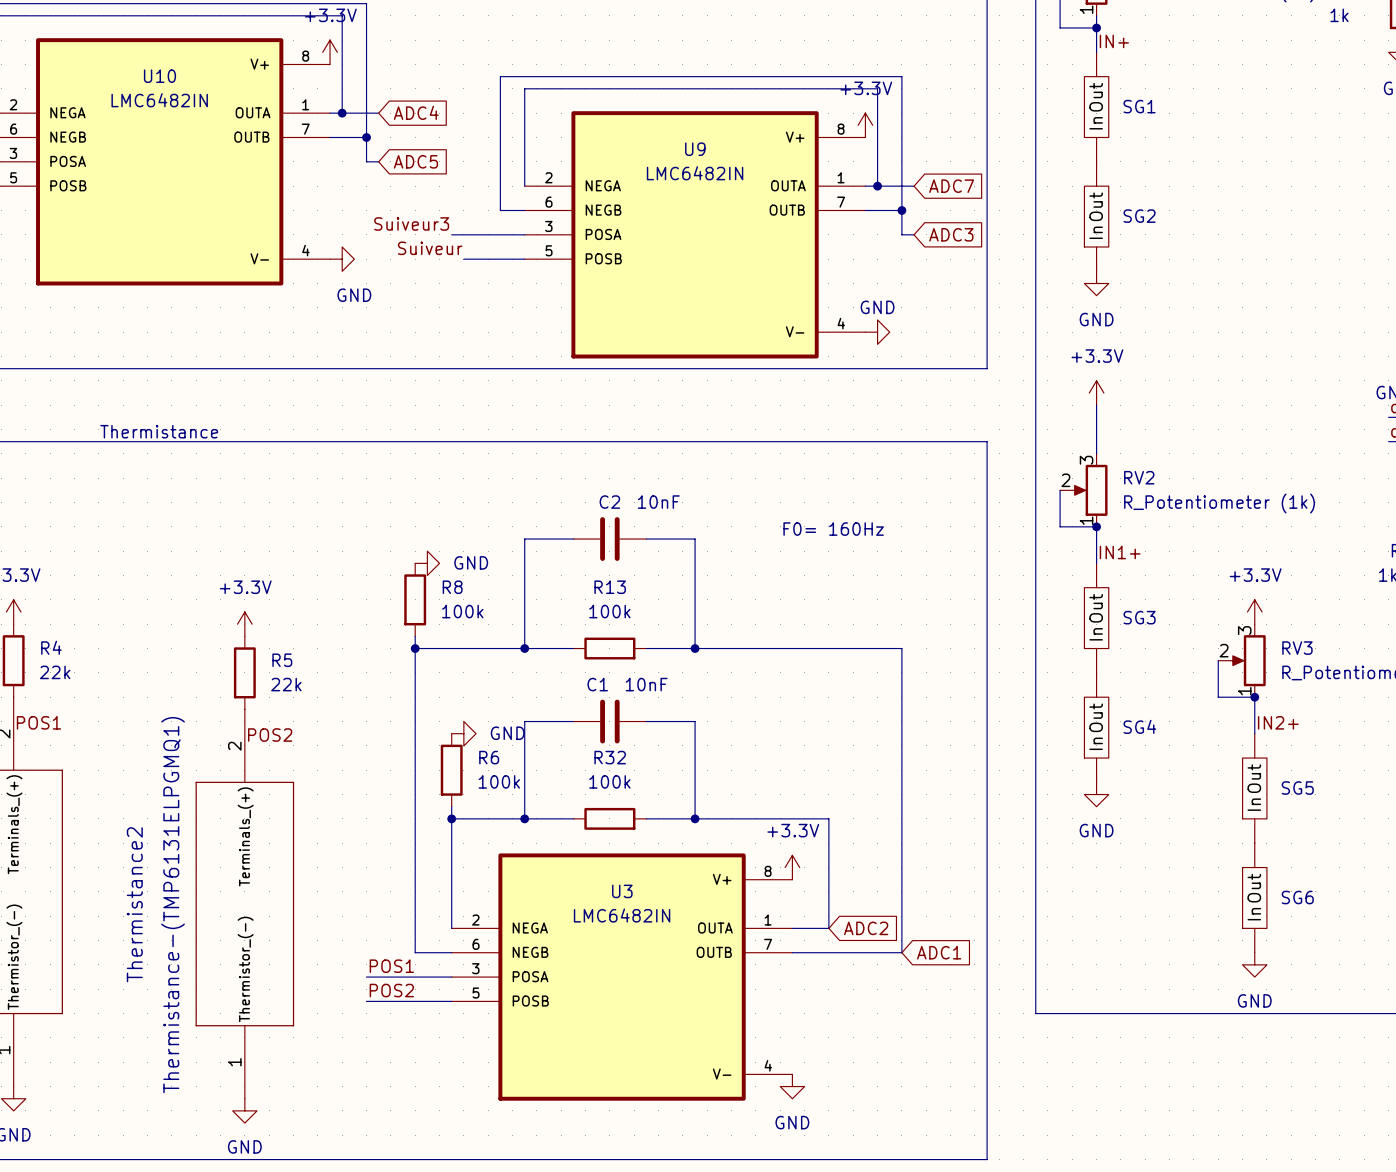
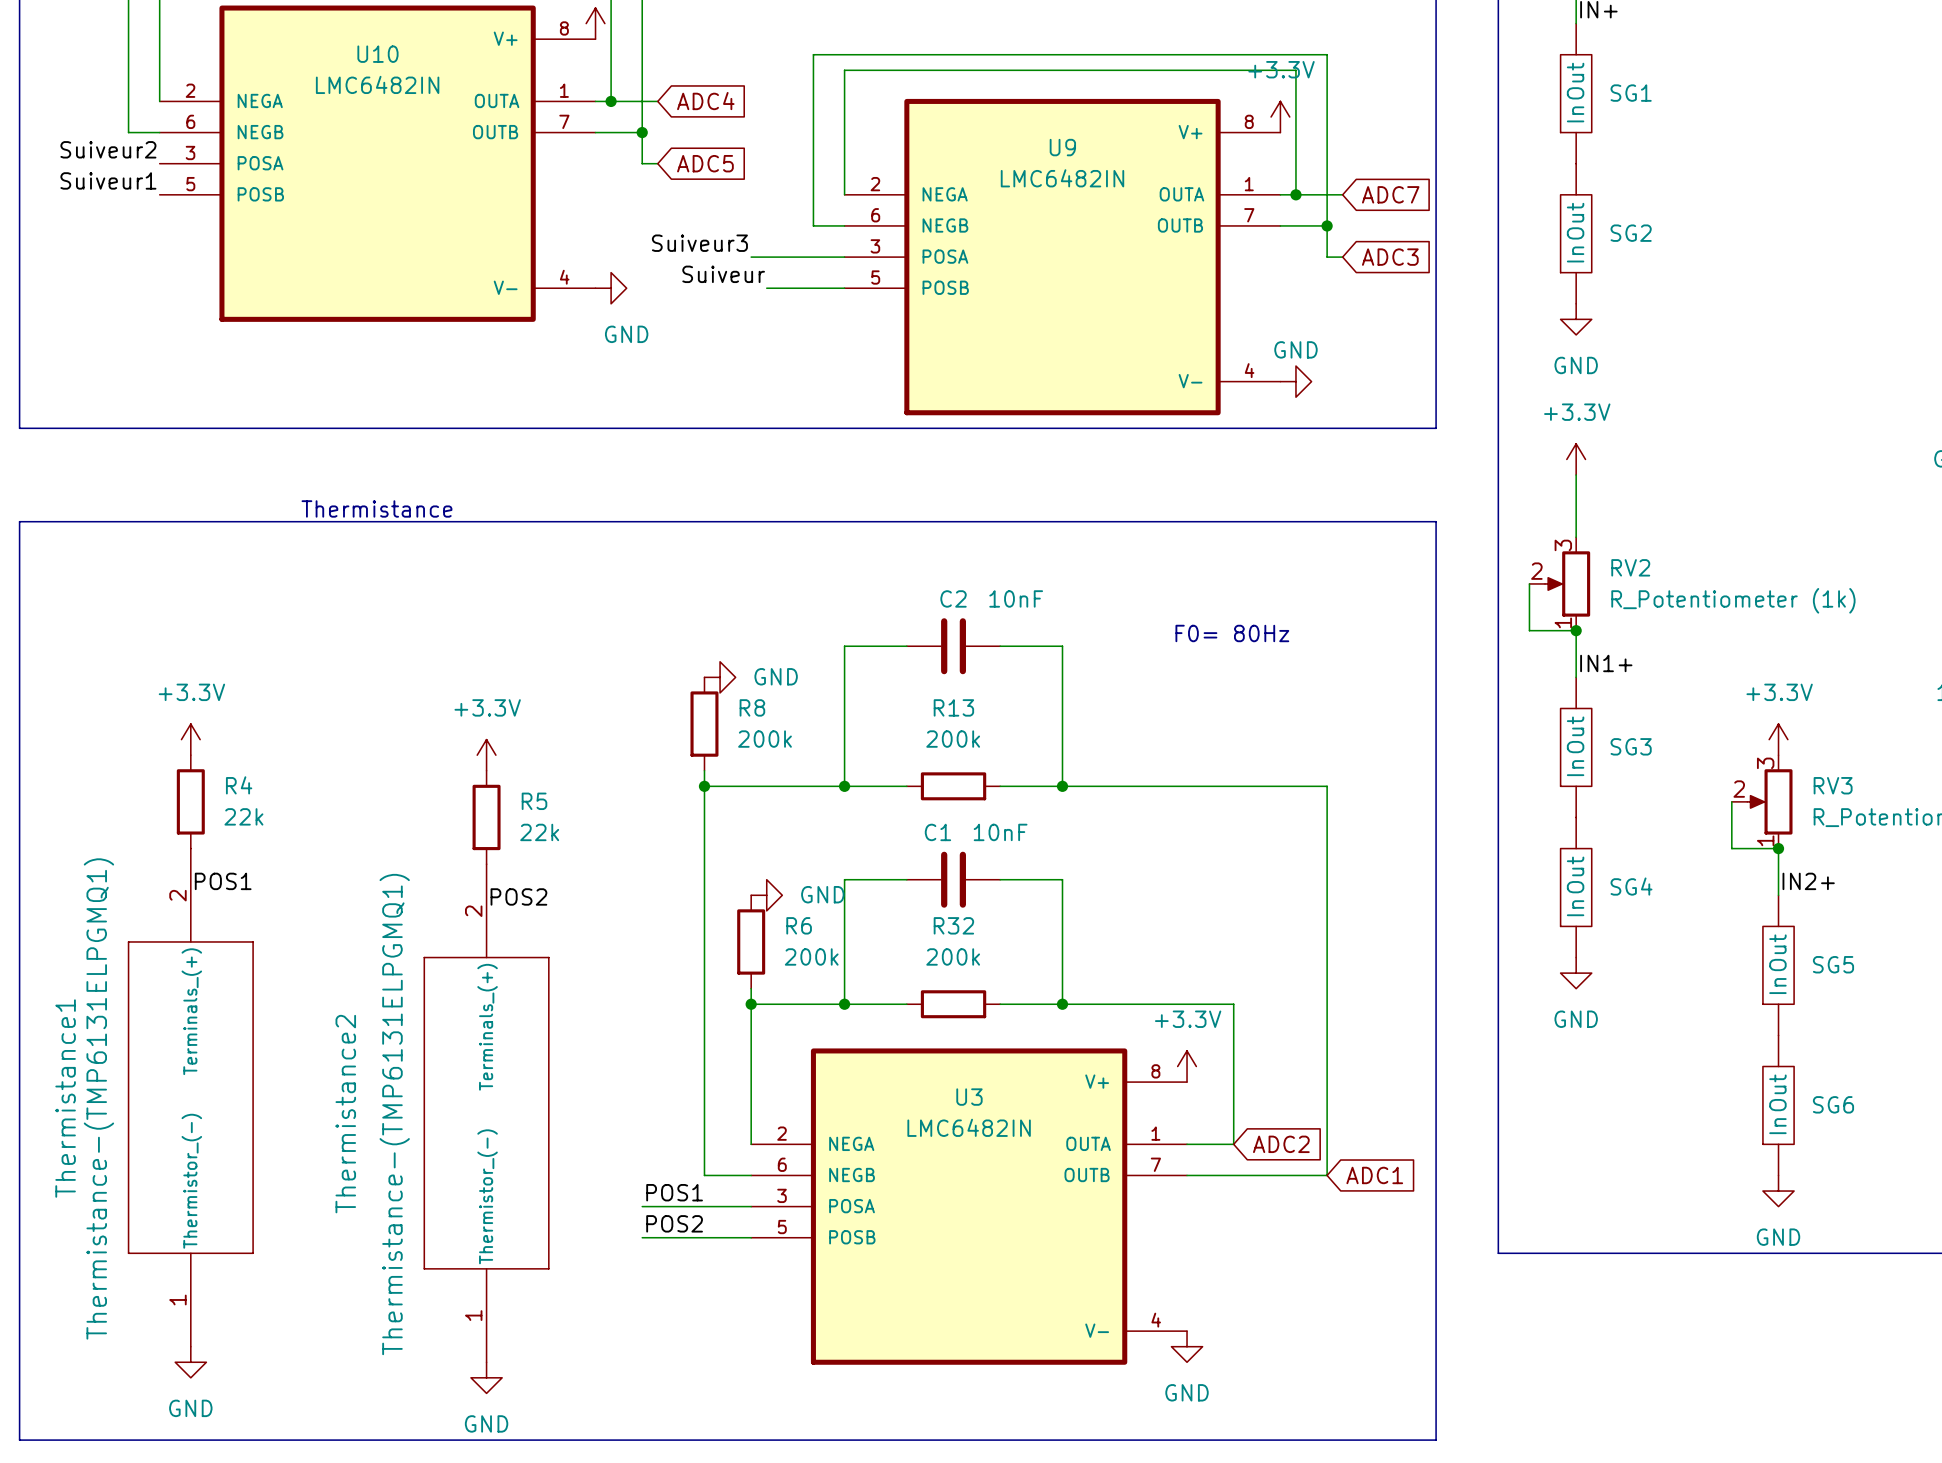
text: F0= 160Hz (833, 529) -> F0= 80Hz (1232, 633)
R8 value: 100k (462, 611) -> 200k (765, 739)
R13 value: 100k (609, 611) -> 200k (953, 739)
R6 value: 100k (499, 781) -> 200k (811, 956)
R32 value: 100k (609, 781) -> 200k (953, 956)

